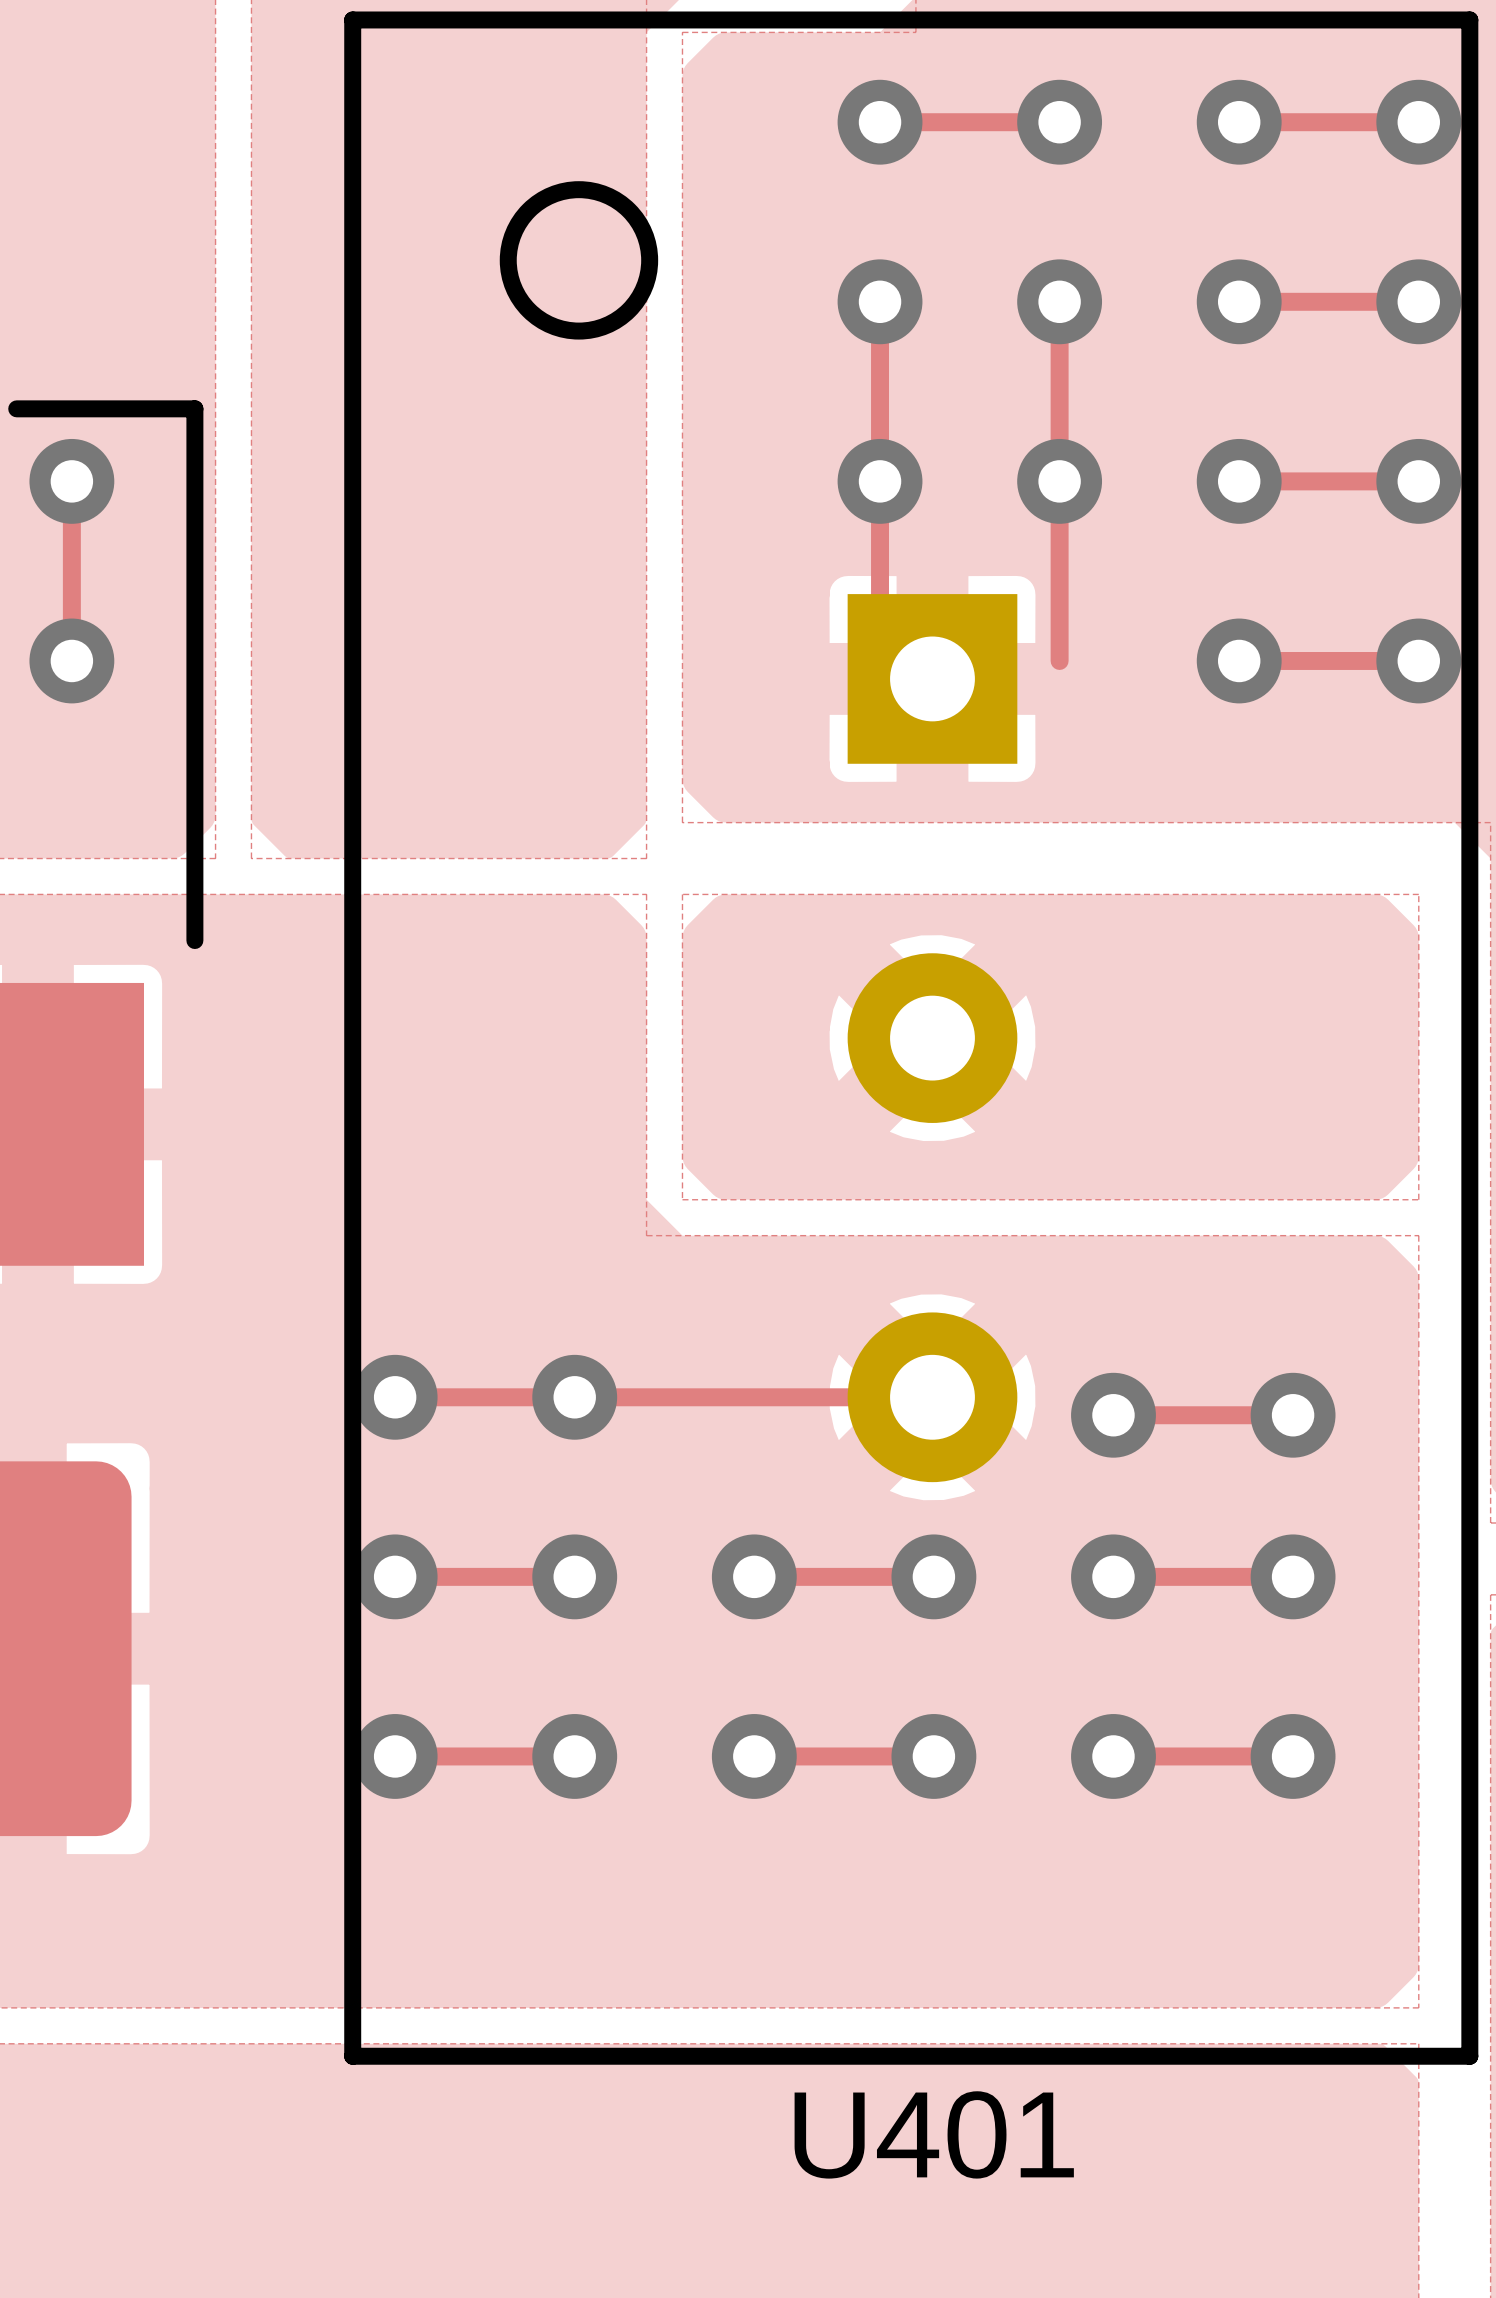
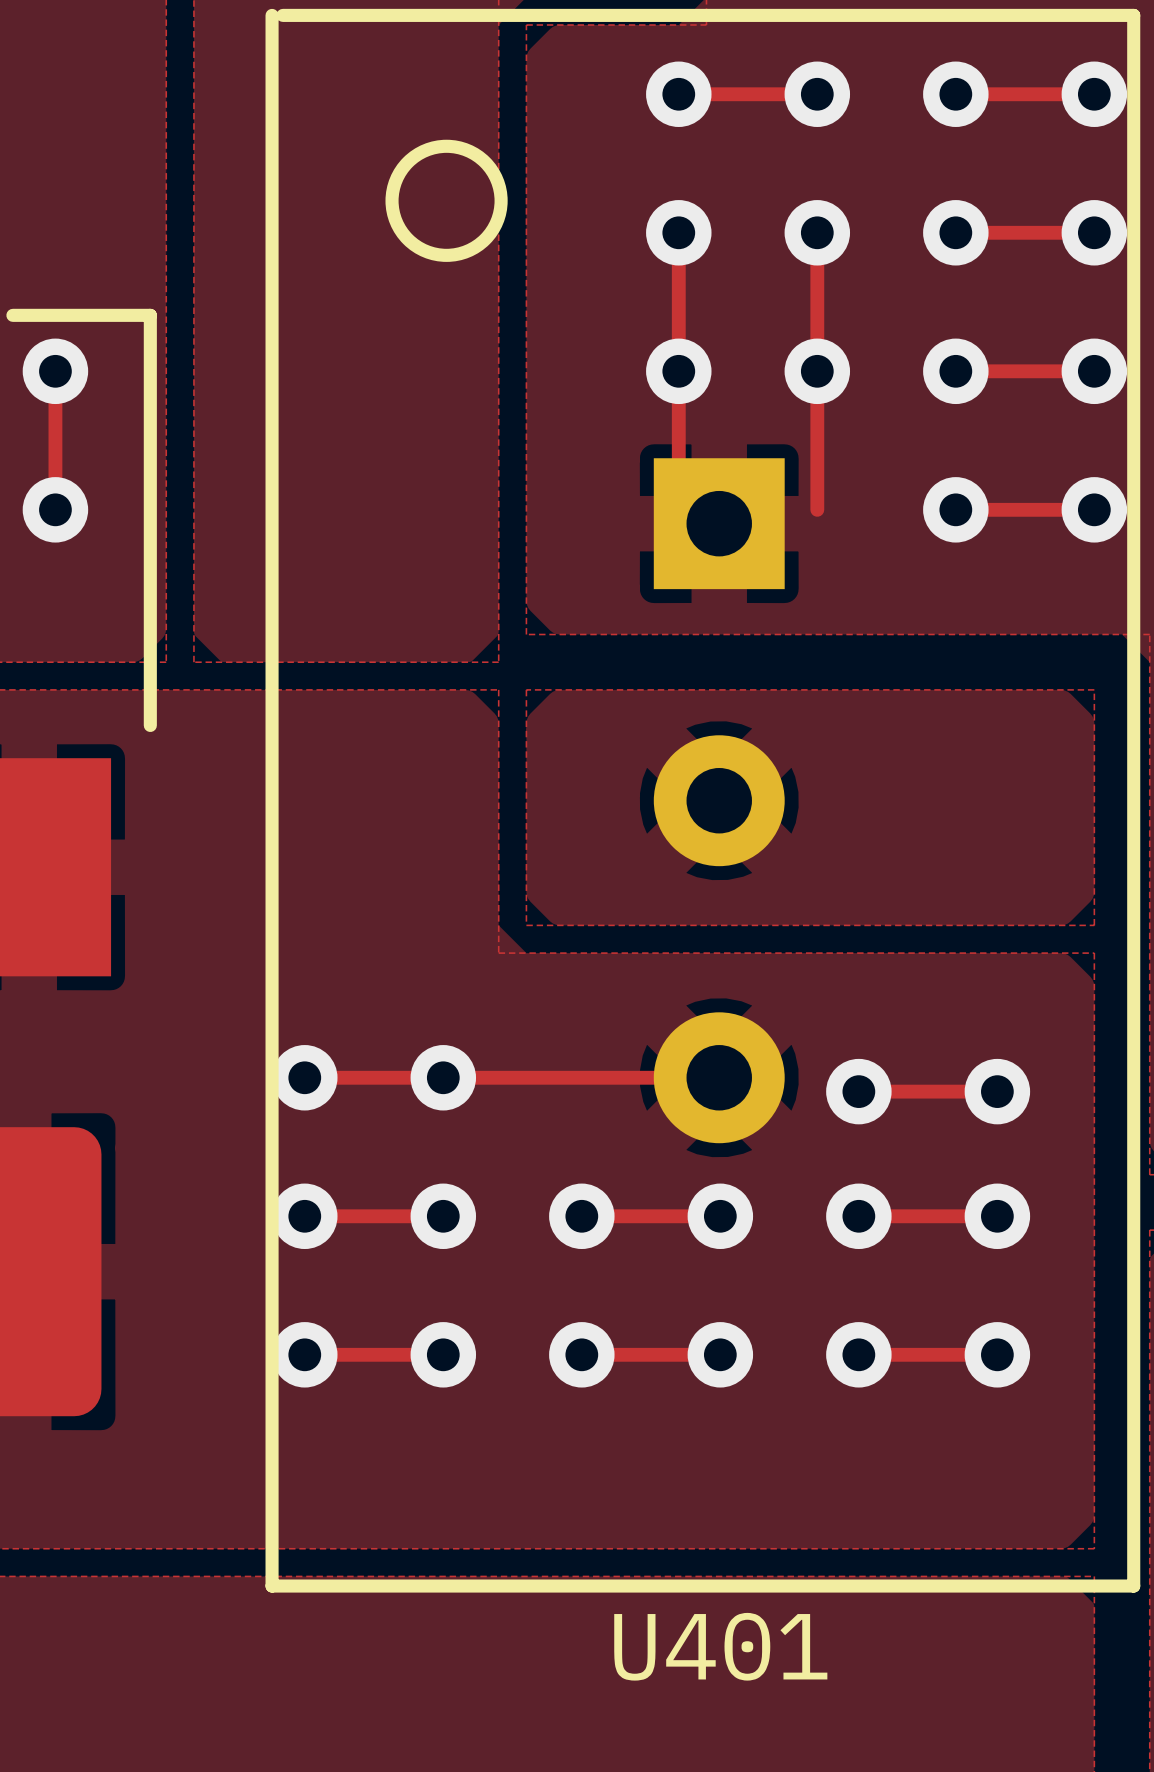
U401 footprint: [344, 11, 1479, 2065] -> [265, 8, 1141, 1593]

